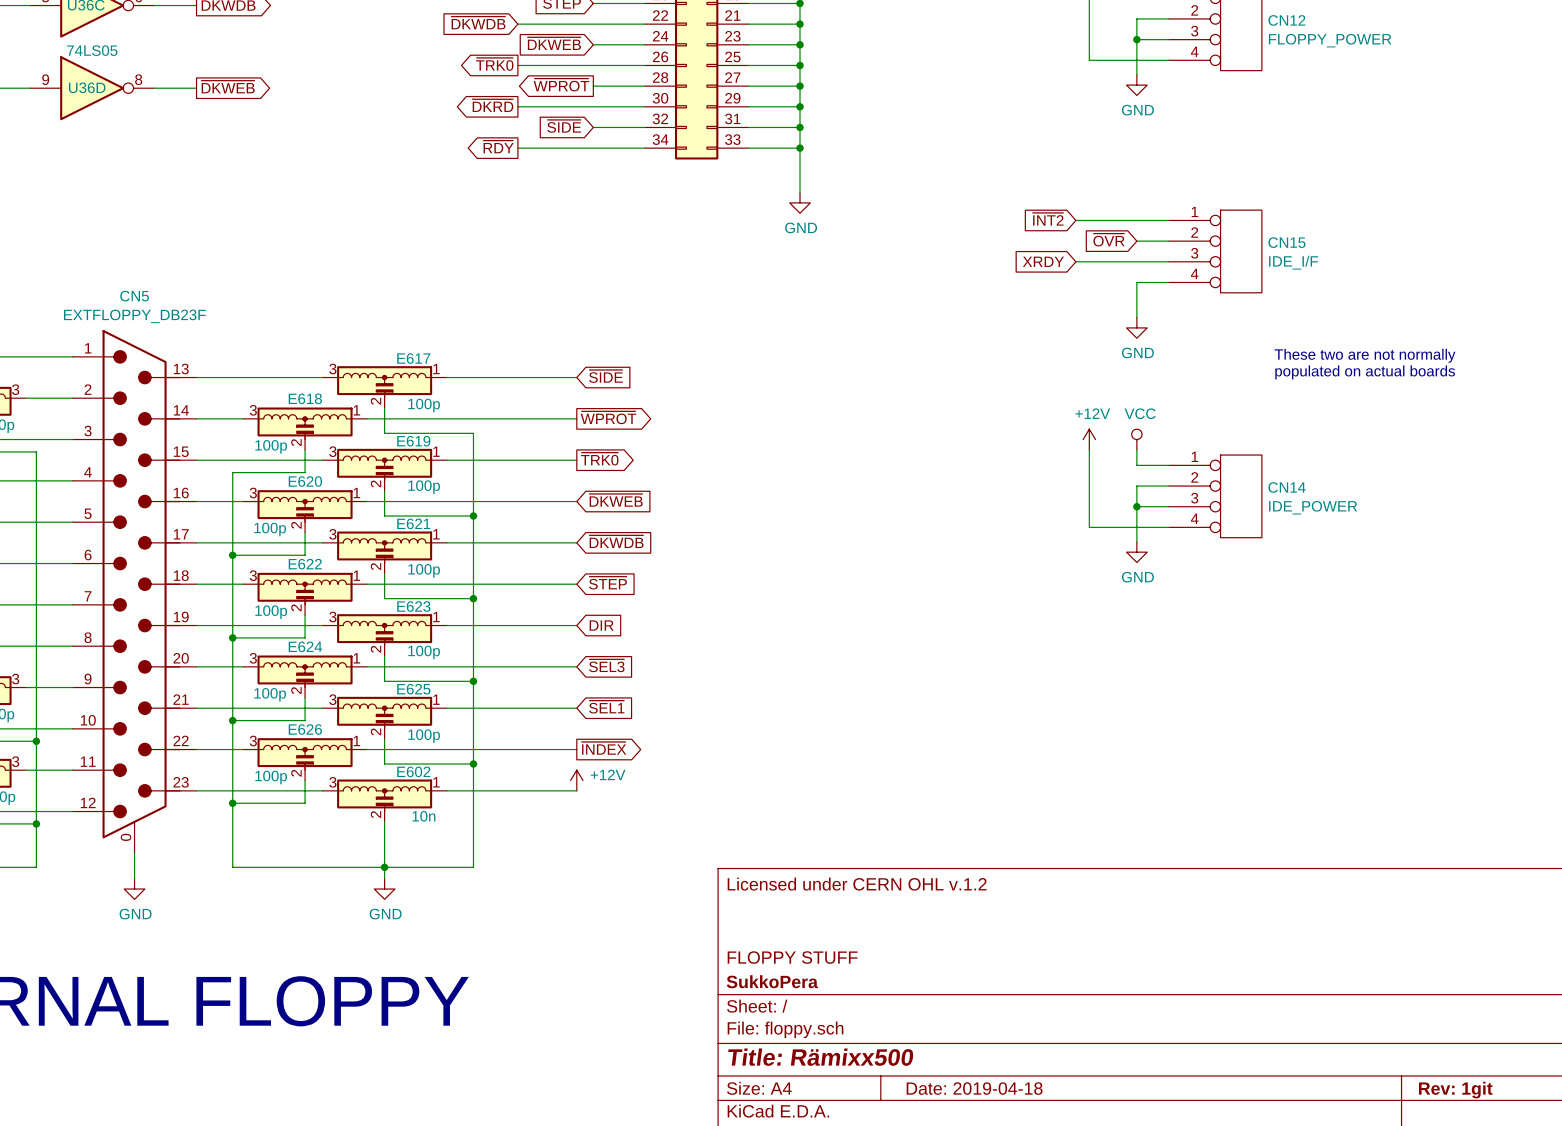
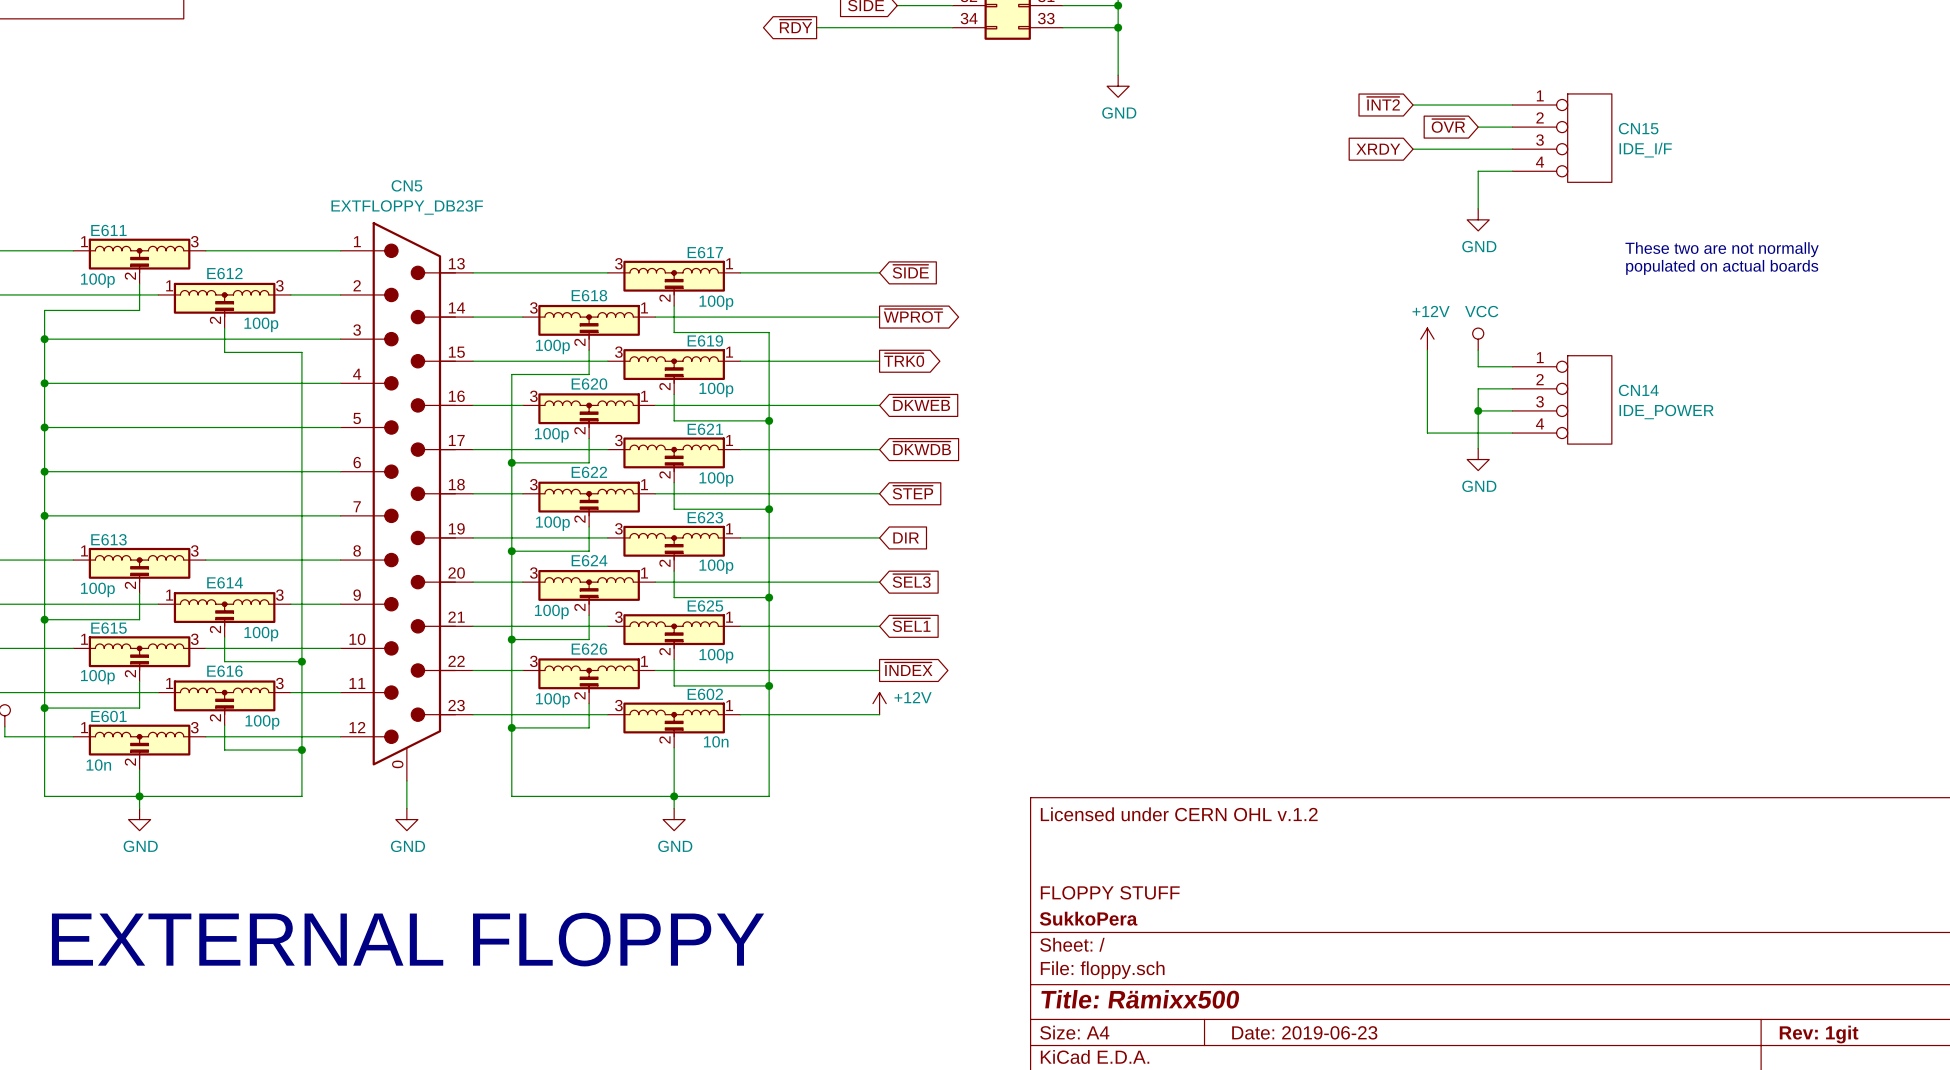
title block: Date: 2019-04-18 (974, 1088) -> Date: 2019-06-23 (1304, 1032)

